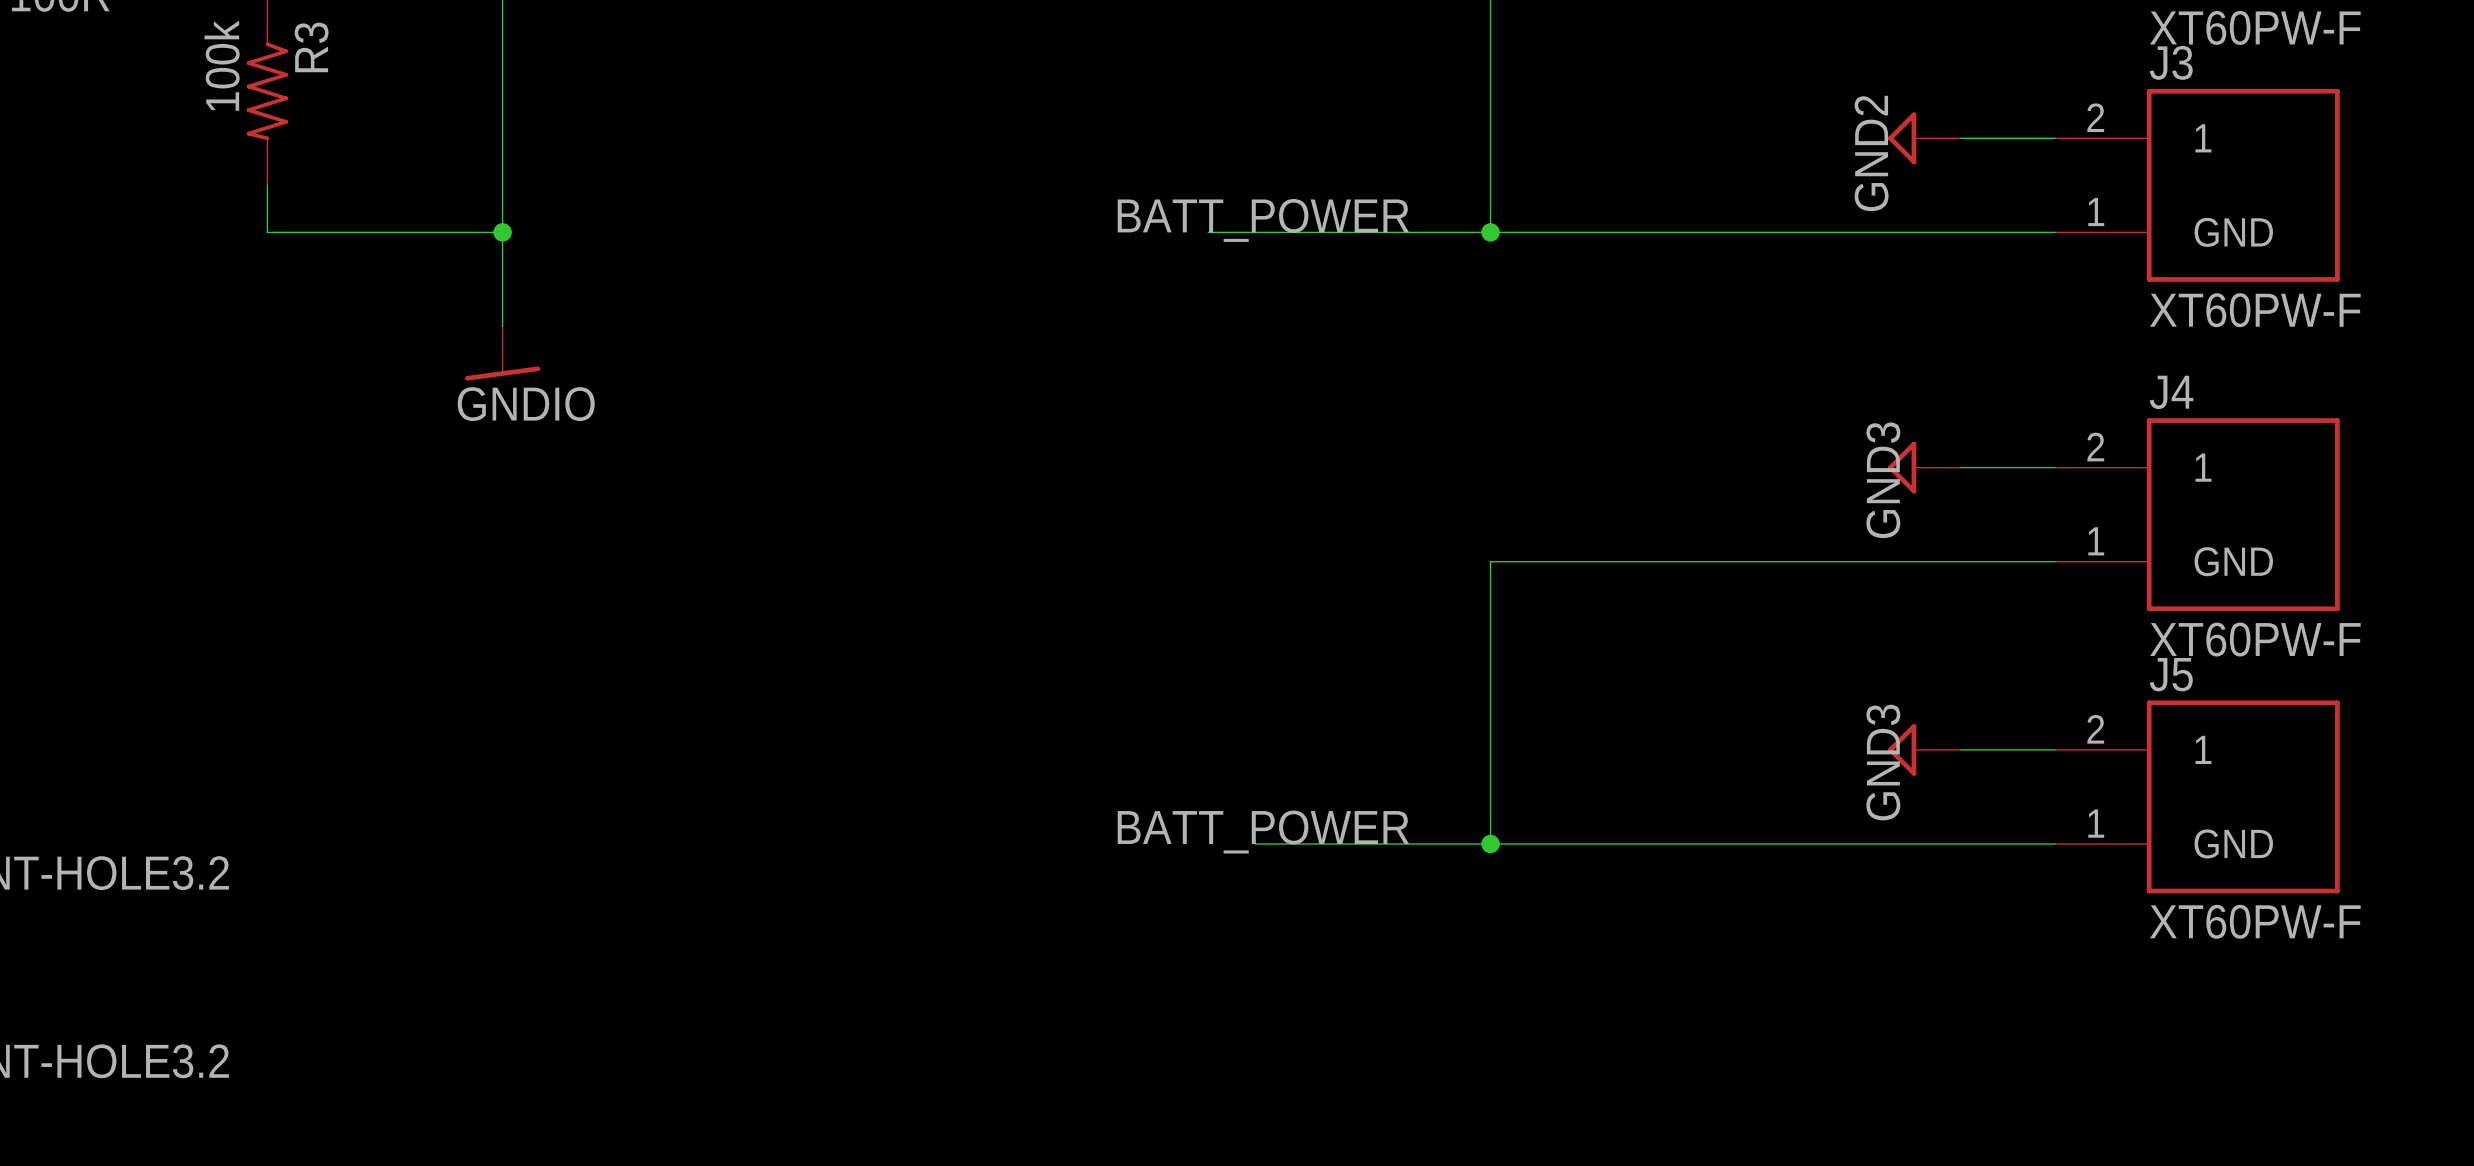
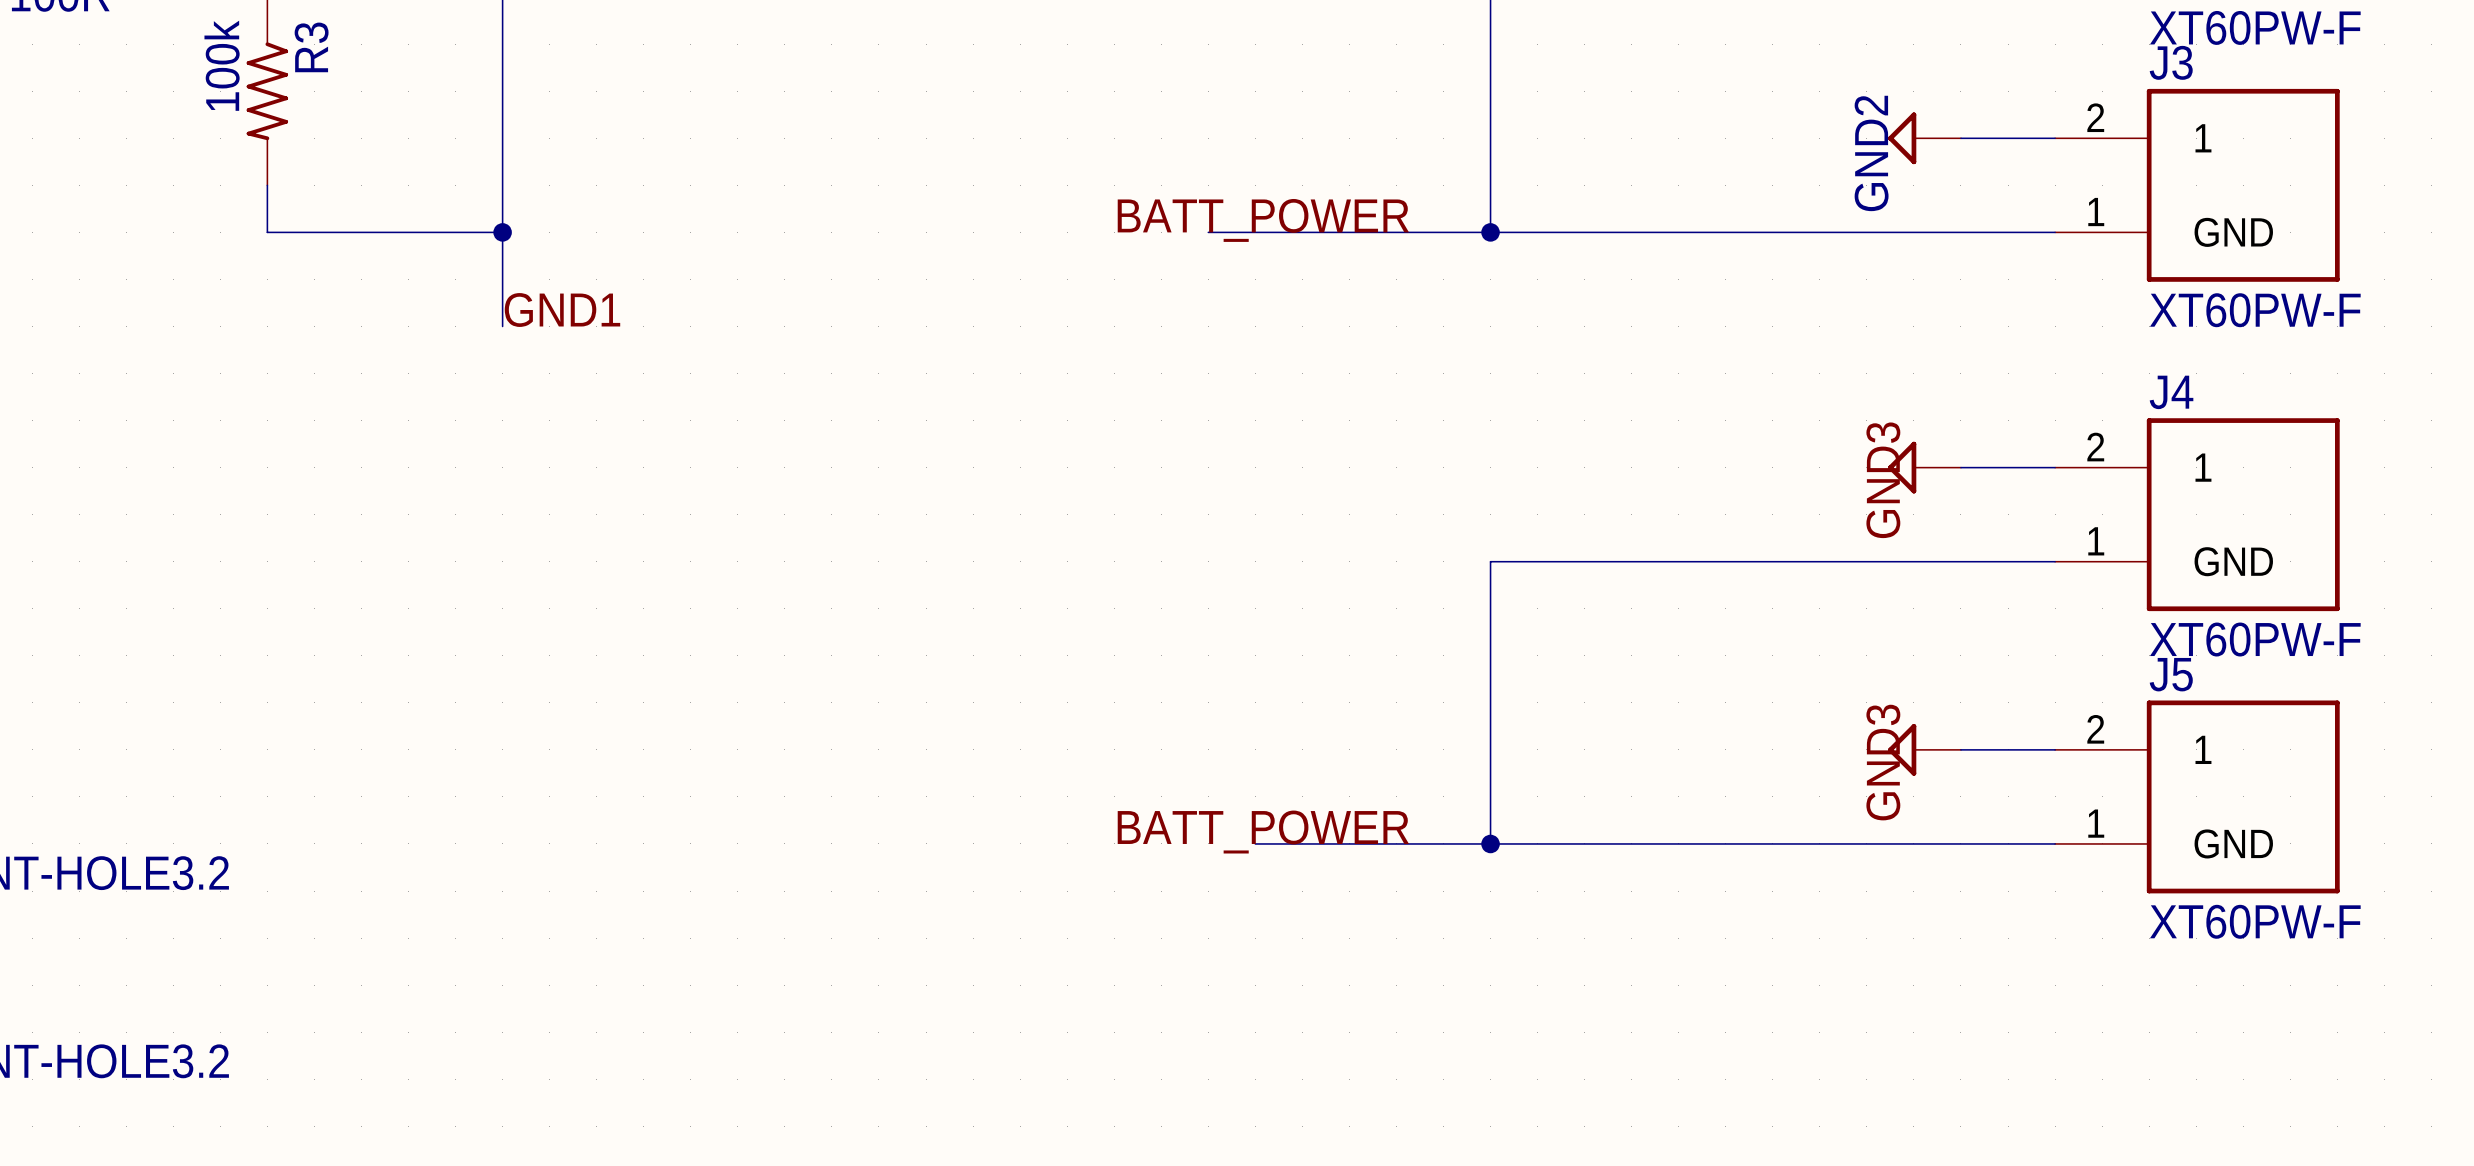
label: none -> GND1 (562, 310)
power symbol: GNDIO (502, 353) -> none

